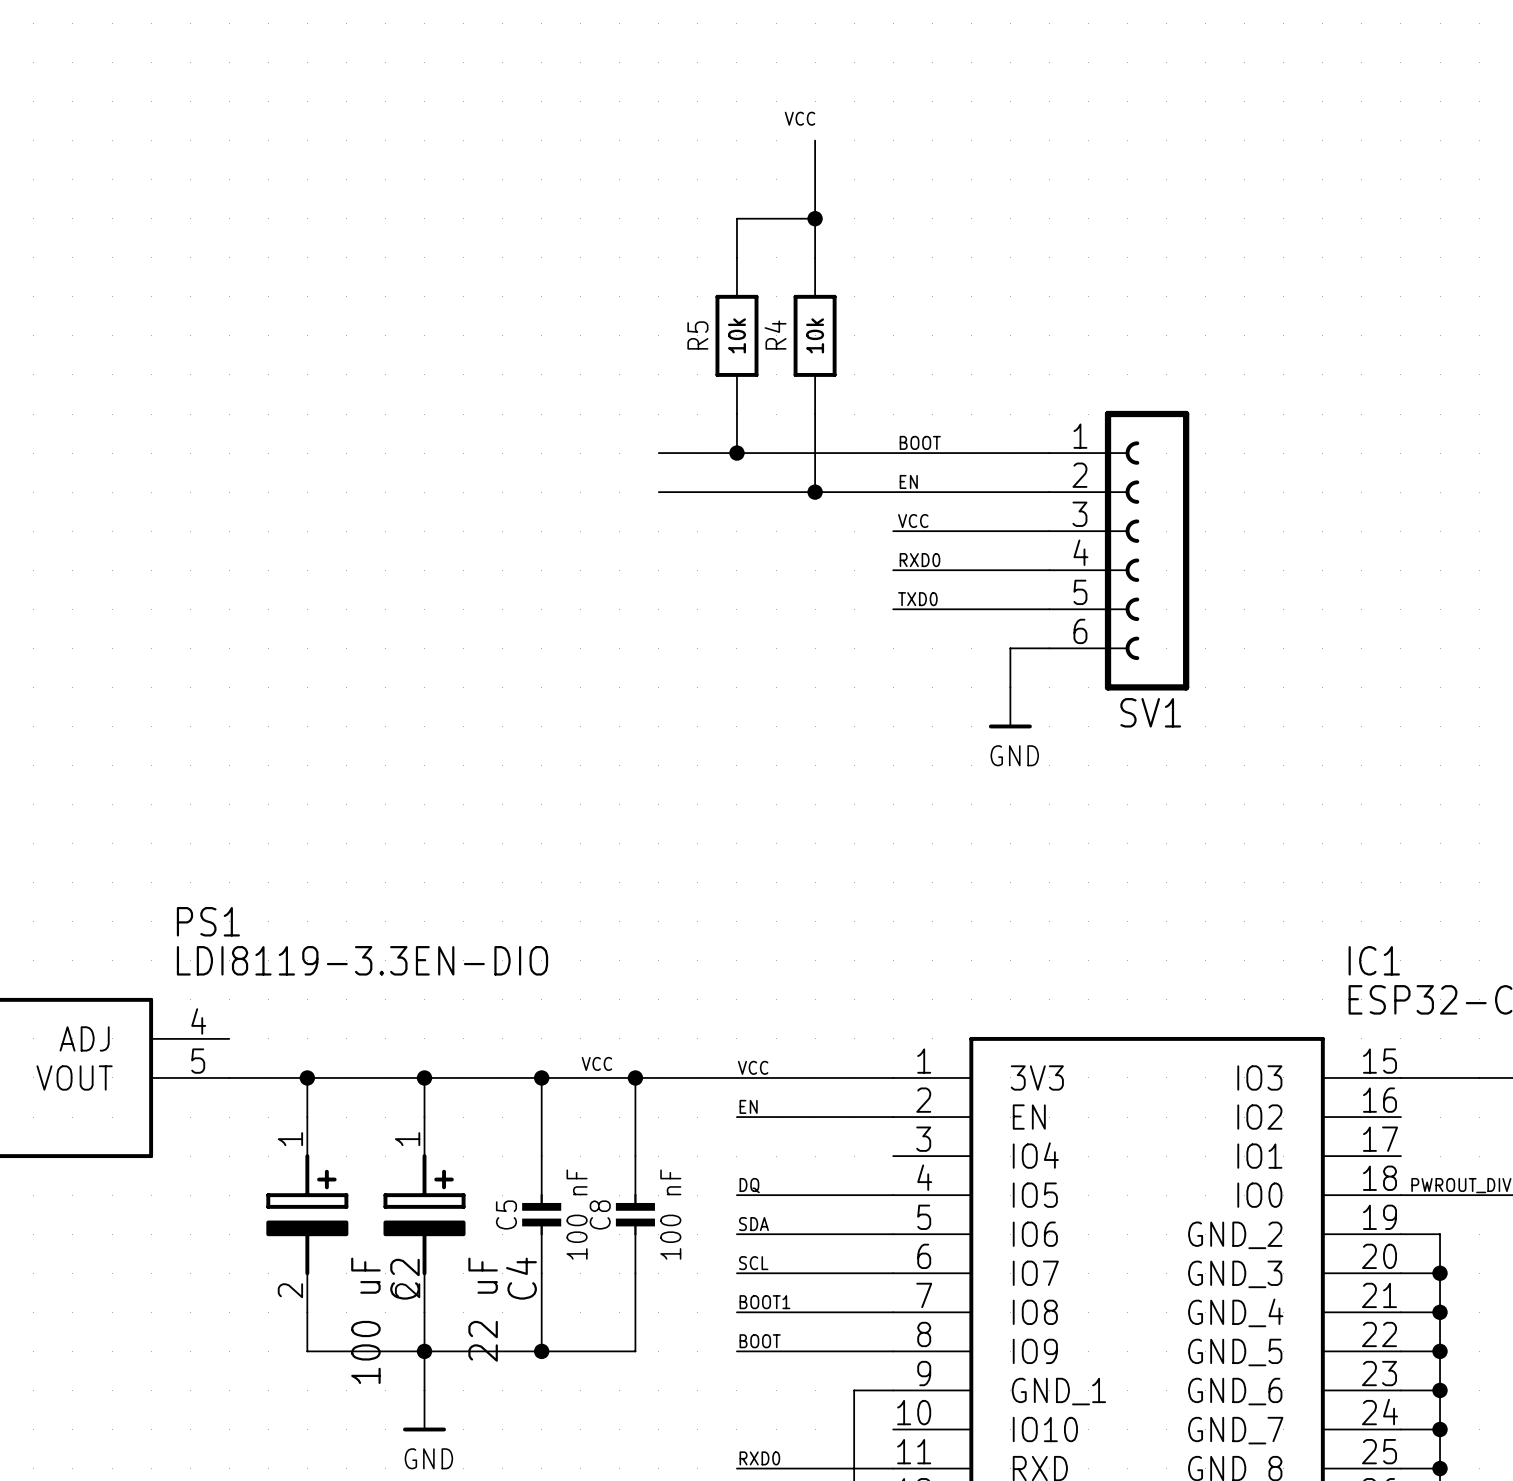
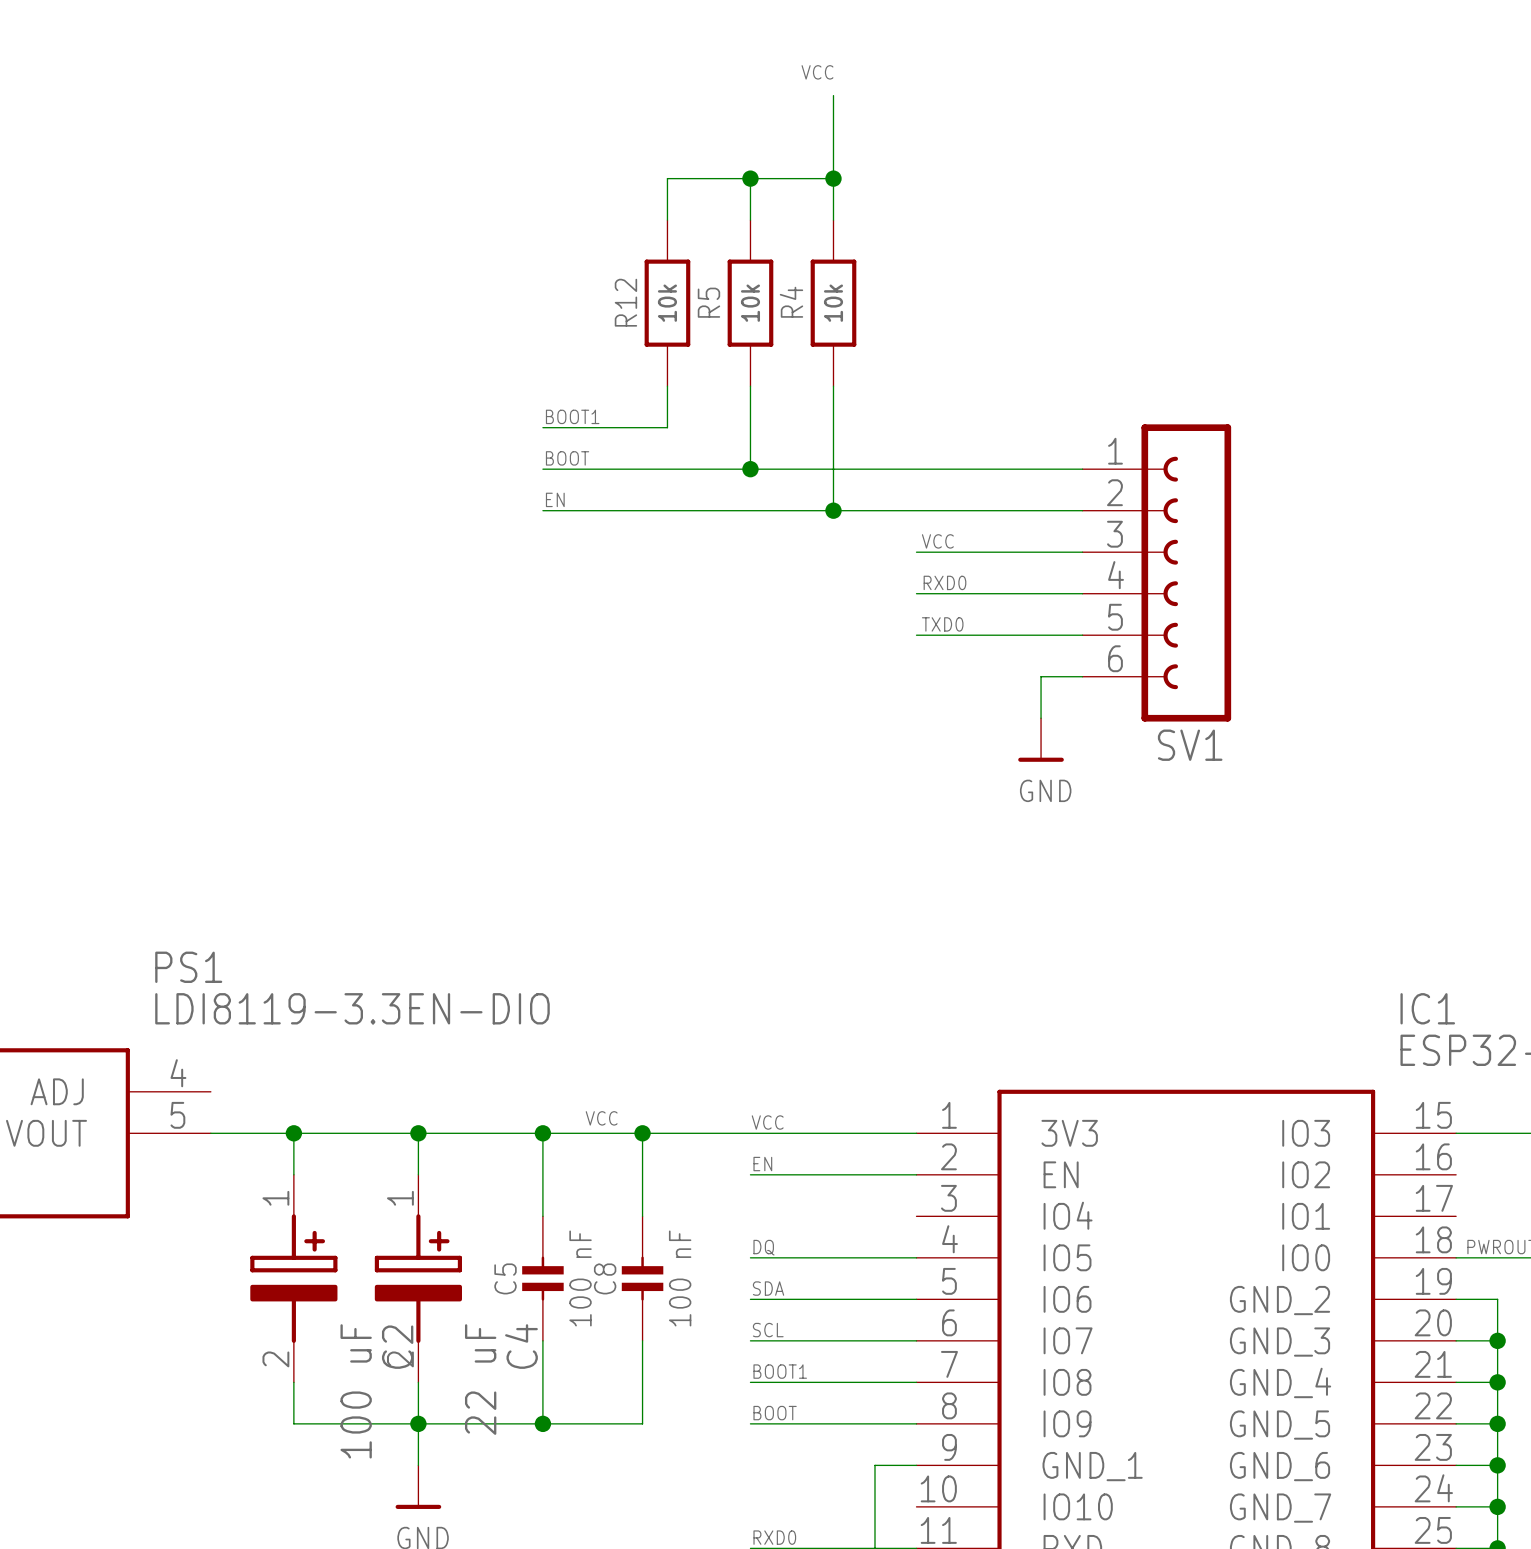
wire: none -> (833, 95) (833, 137)
label position: VCC (800, 118) -> VCC (817, 72)
wire: none -> (750, 178) (750, 220)
junction: none -> (750, 178)
wire: none -> (833, 178) (667, 178) (667, 220)
junction position: (815, 218) -> (833, 178)
wire: (736, 257) (736, 218) (815, 218) (815, 257) -> none
R12: none -> 10k (667, 303)
R5 position: (736, 335) -> (750, 303)
R4 position: (815, 335) -> (833, 303)
wire: none -> (667, 386) (667, 427) (542, 427)
label: none -> BOOT1 (572, 416)
label position: BOOT (920, 442) -> BOOT (567, 458)
wire: none -> (542, 469) (667, 469)
label position: EN (908, 481) -> EN (555, 499)
wire: none -> (542, 510) (667, 510)

